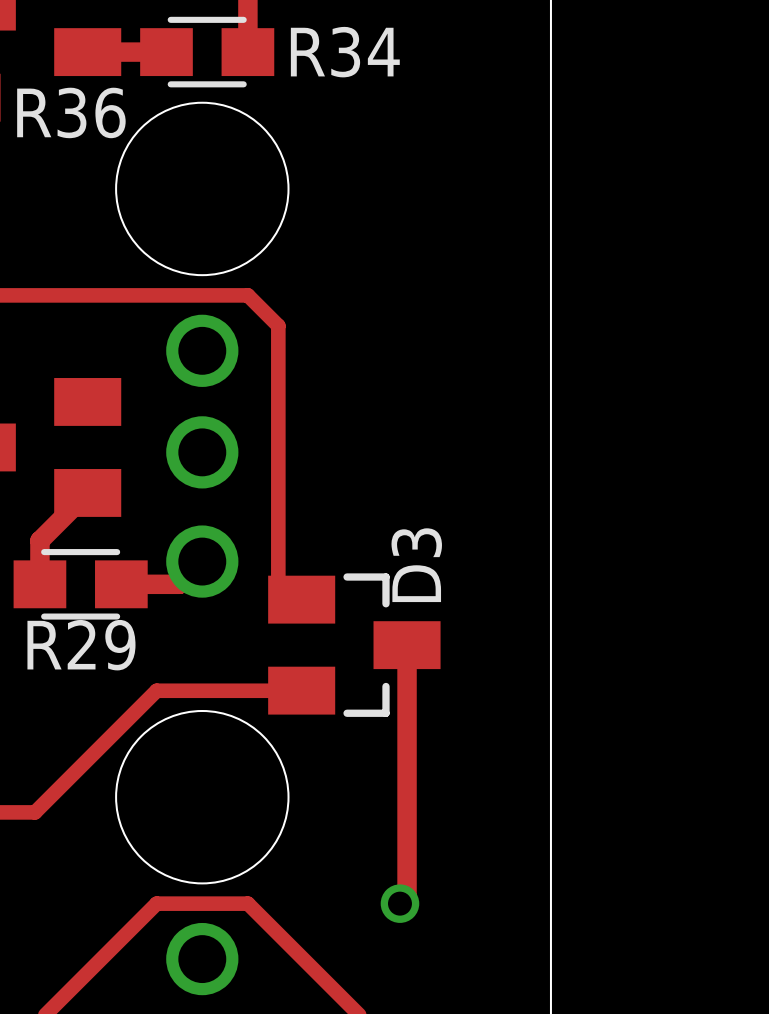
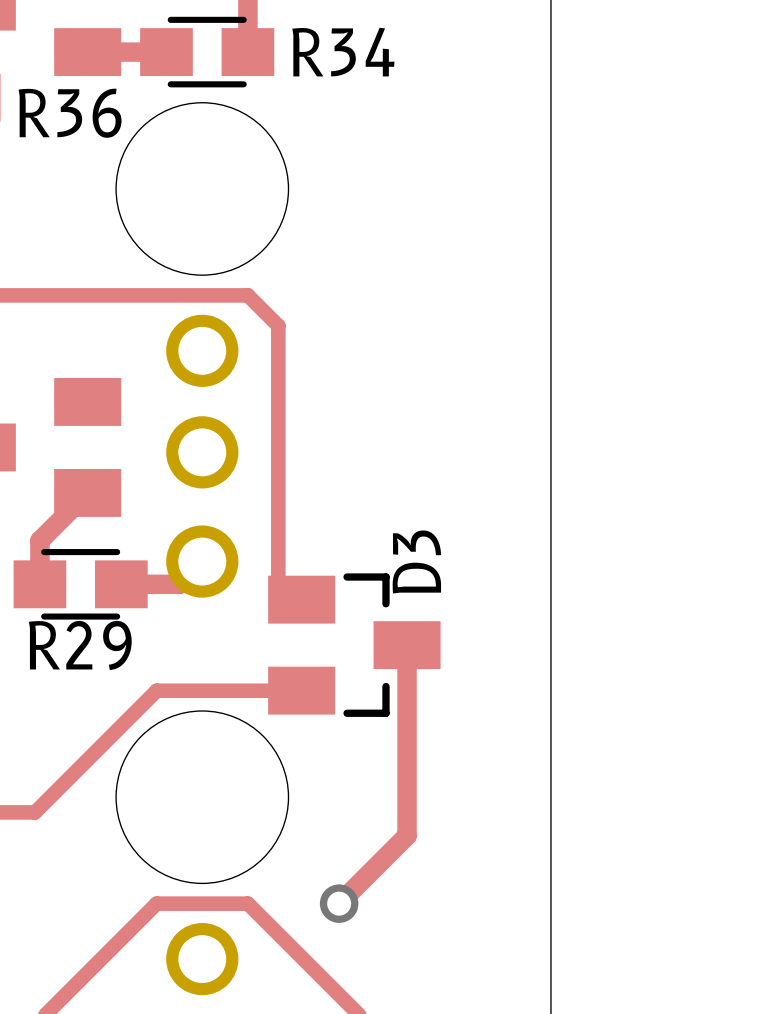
track: (407, 835) (407, 896) (399, 903) -> (407, 835) (339, 903)
via position: (399, 903) -> (339, 903)

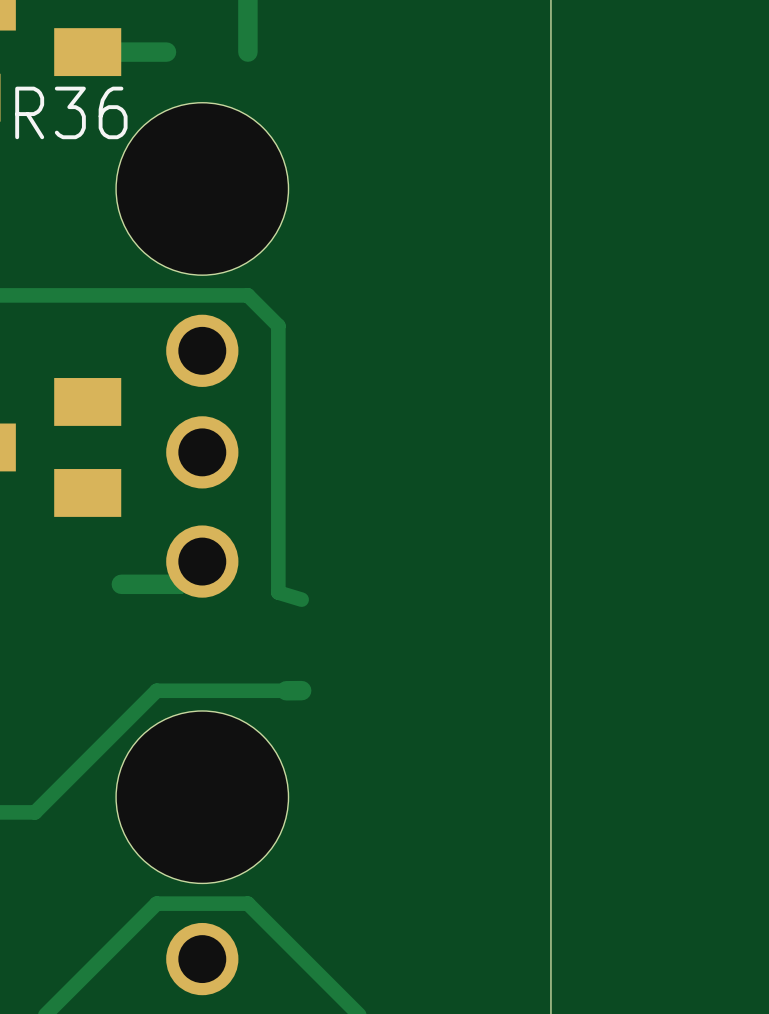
R34: (207, 52) -> none
track: (87, 492) (39, 540) (39, 584) -> none
R29: (80, 584) -> none
D3: (354, 645) -> none
track: (407, 645) (407, 835) (339, 903) -> none
via: (339, 903) -> none

